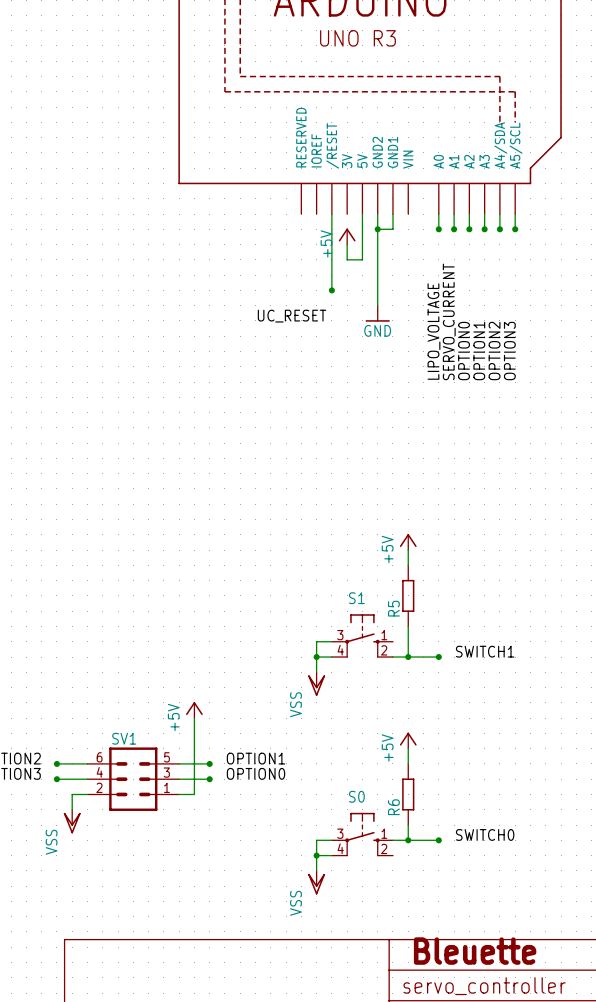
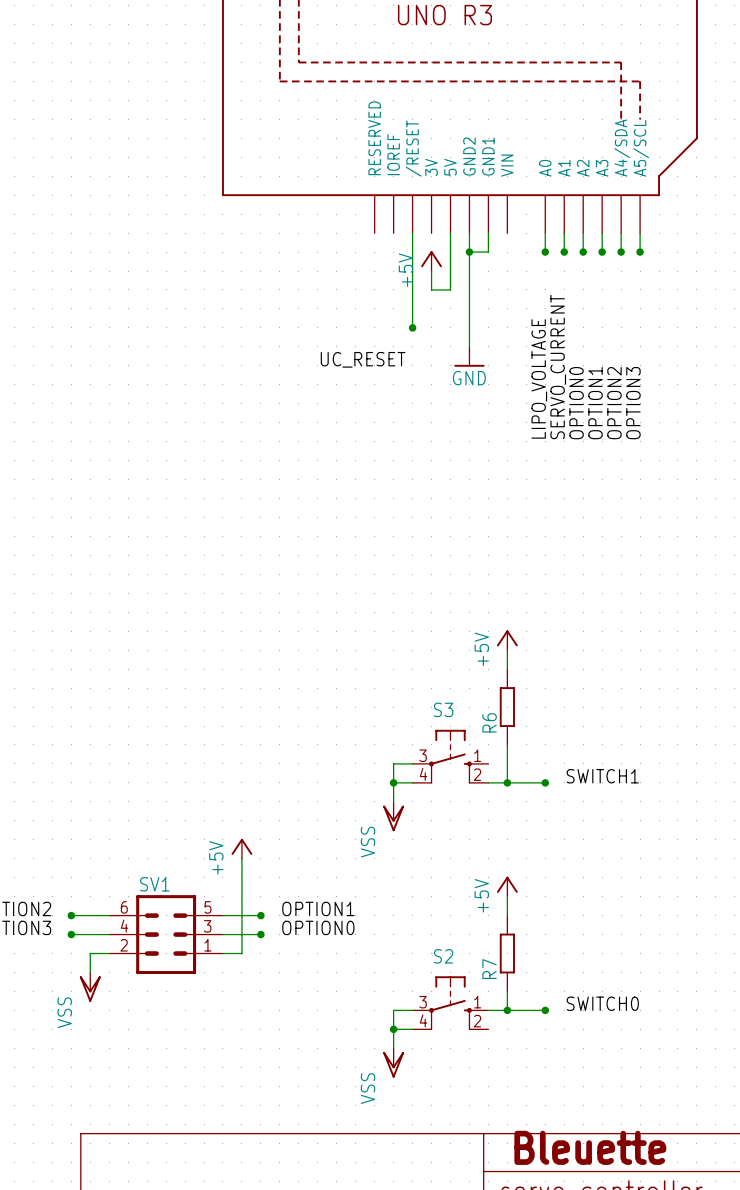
S1 name: S1 (356, 598) -> S3 (443, 709)
R5 name: R5 (393, 608) -> R6 (489, 722)
S0 name: S0 (356, 796) -> S2 (443, 956)
R6 name: R6 (393, 807) -> R7 (489, 969)

